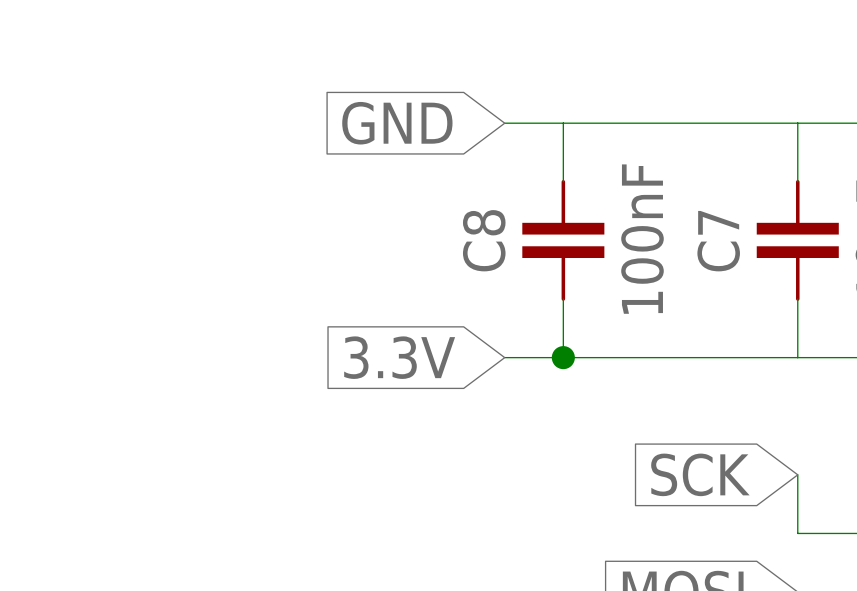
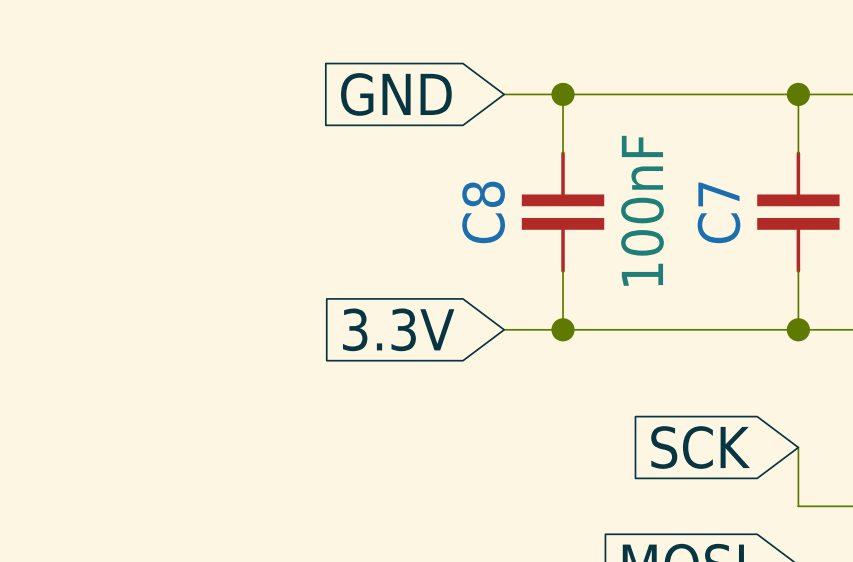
junction: none -> (563, 94)
junction: none -> (798, 94)
junction: none -> (798, 329)

